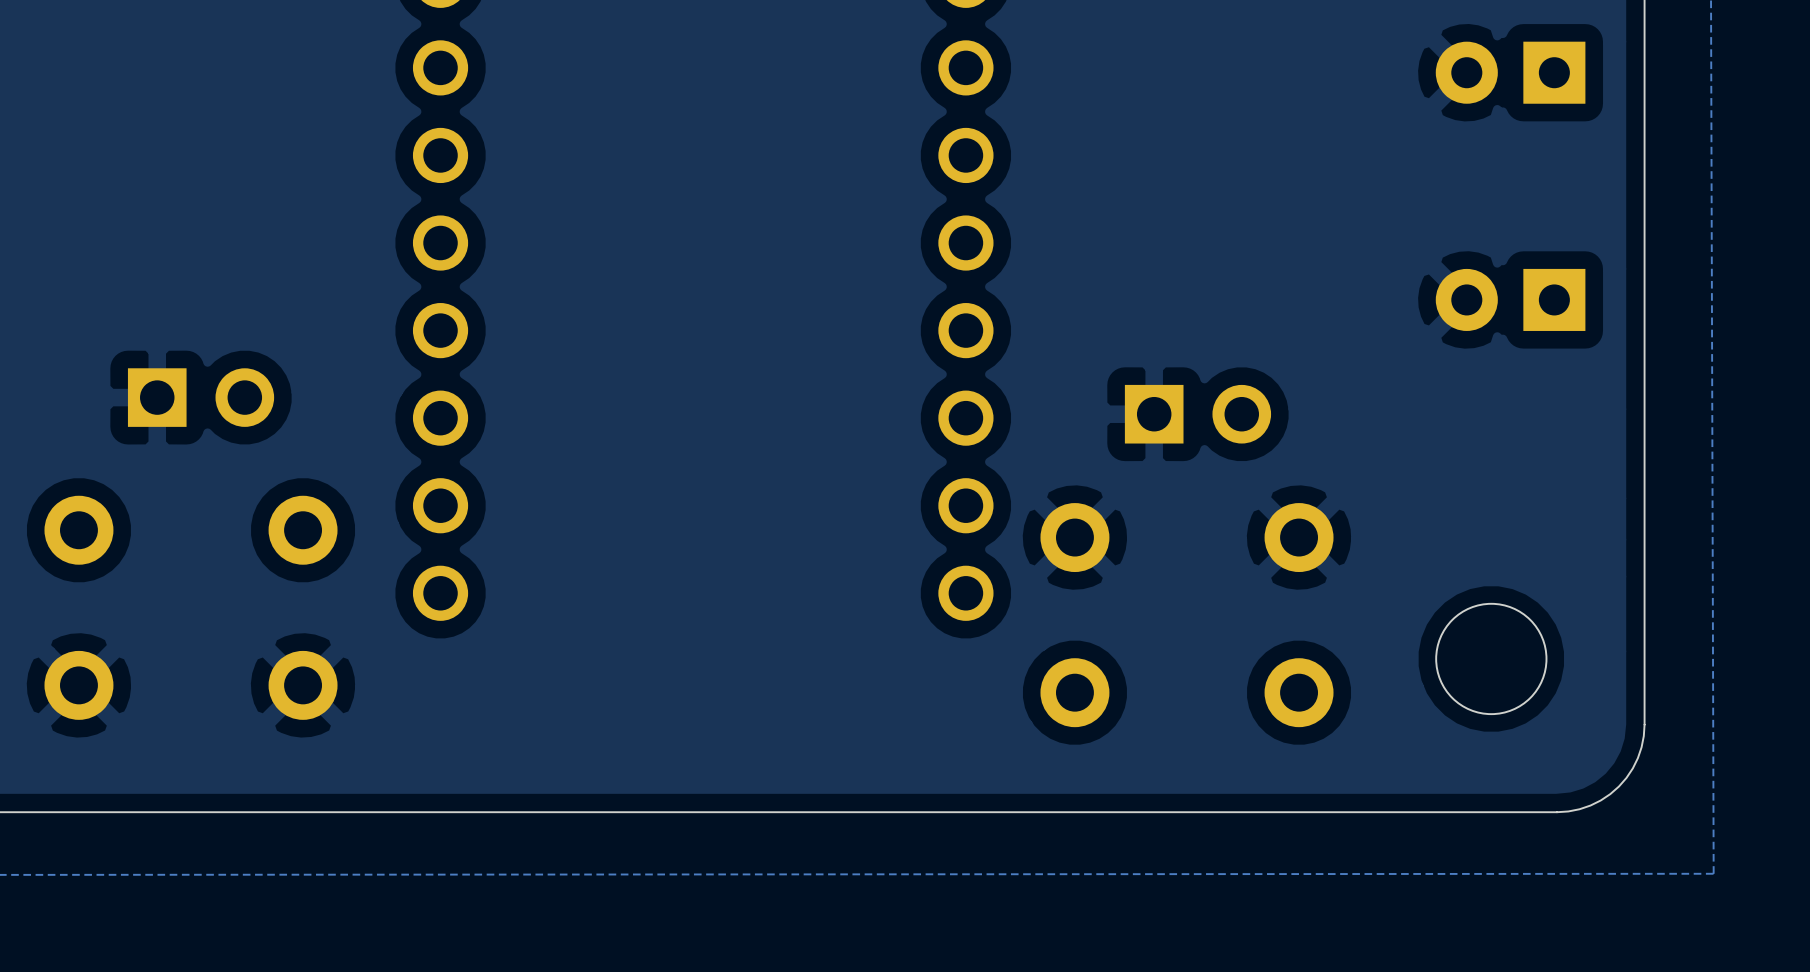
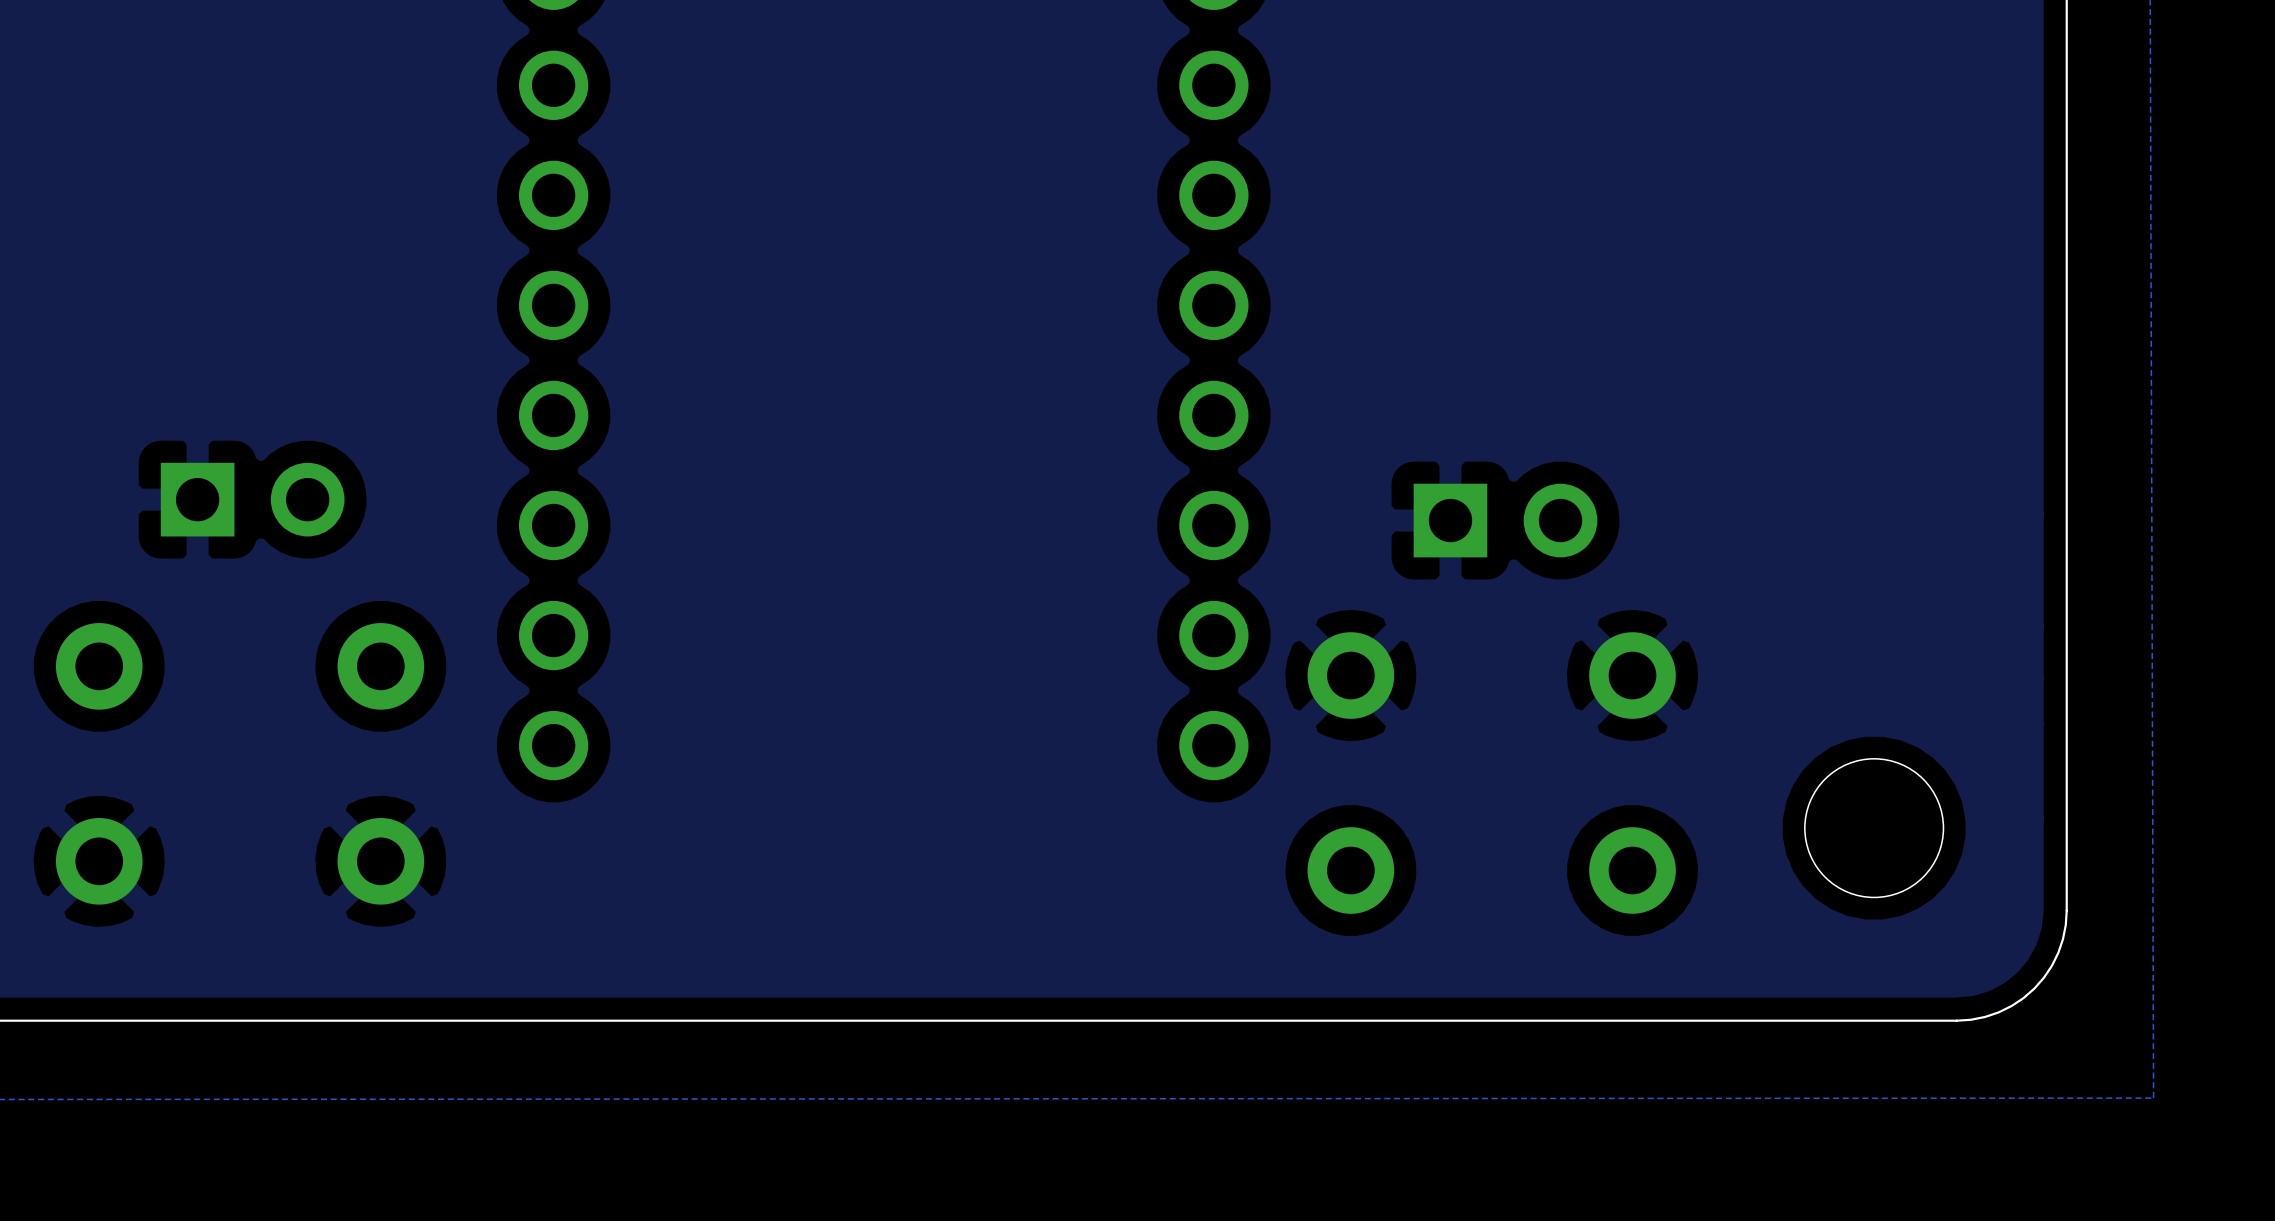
part: (1510, 72) -> none
part: (1510, 299) -> none

